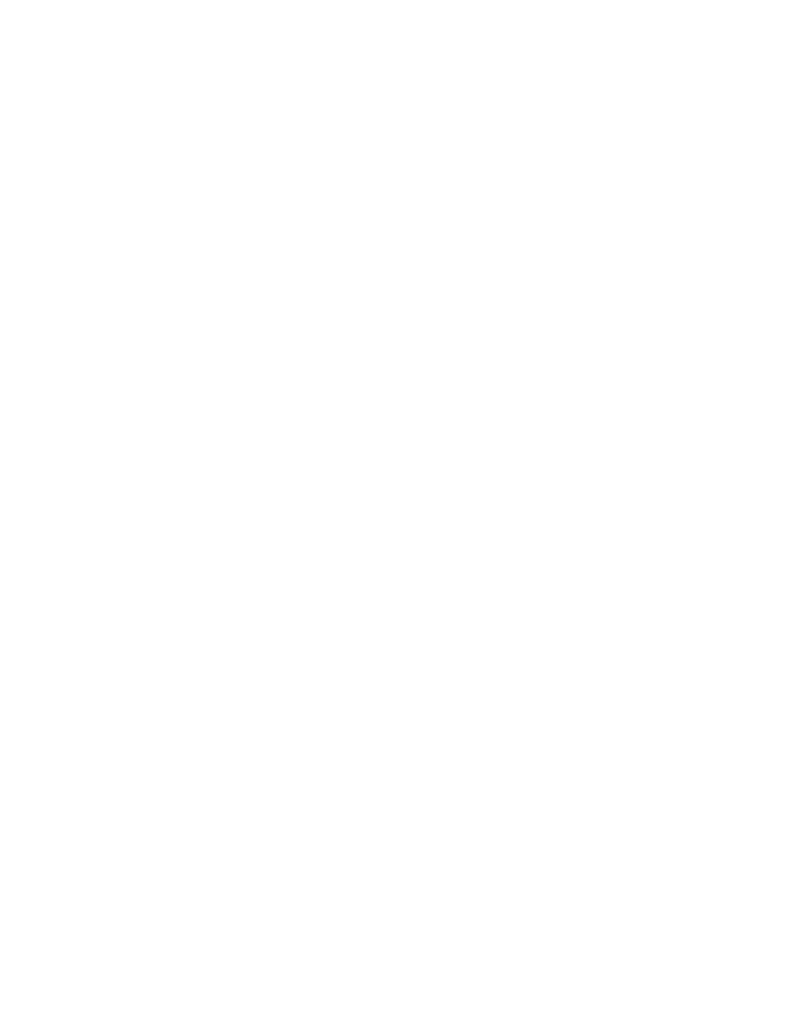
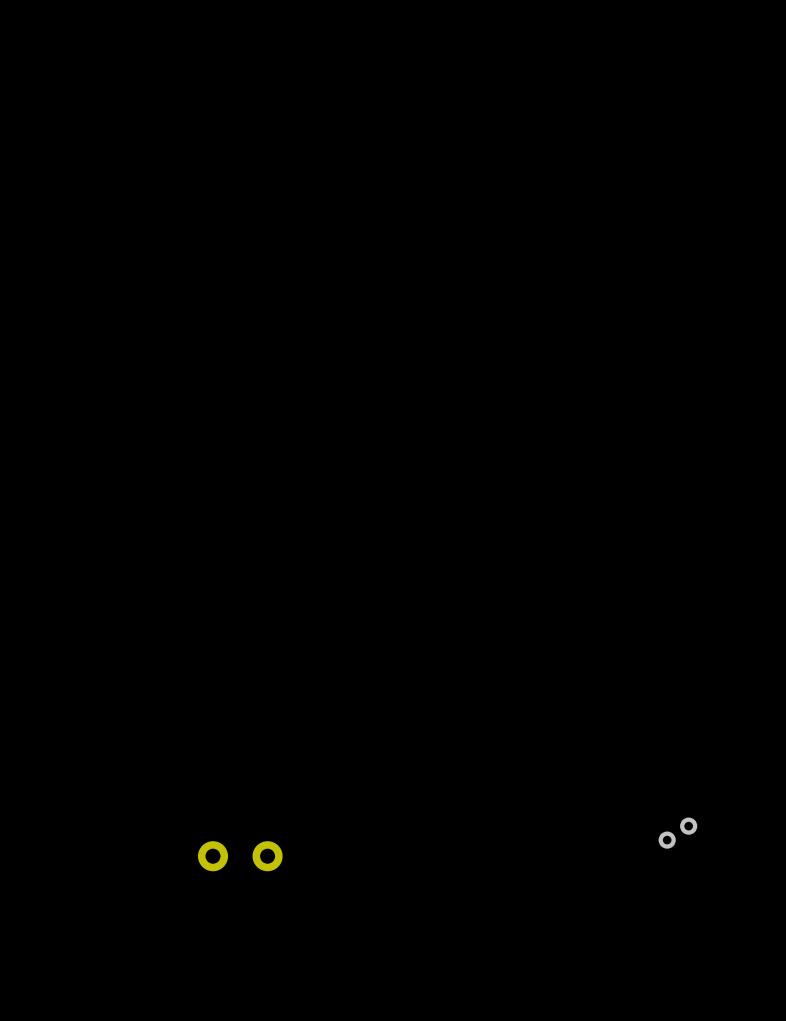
via: none -> (688, 826)
via: none -> (667, 840)
part: none -> (240, 856)

